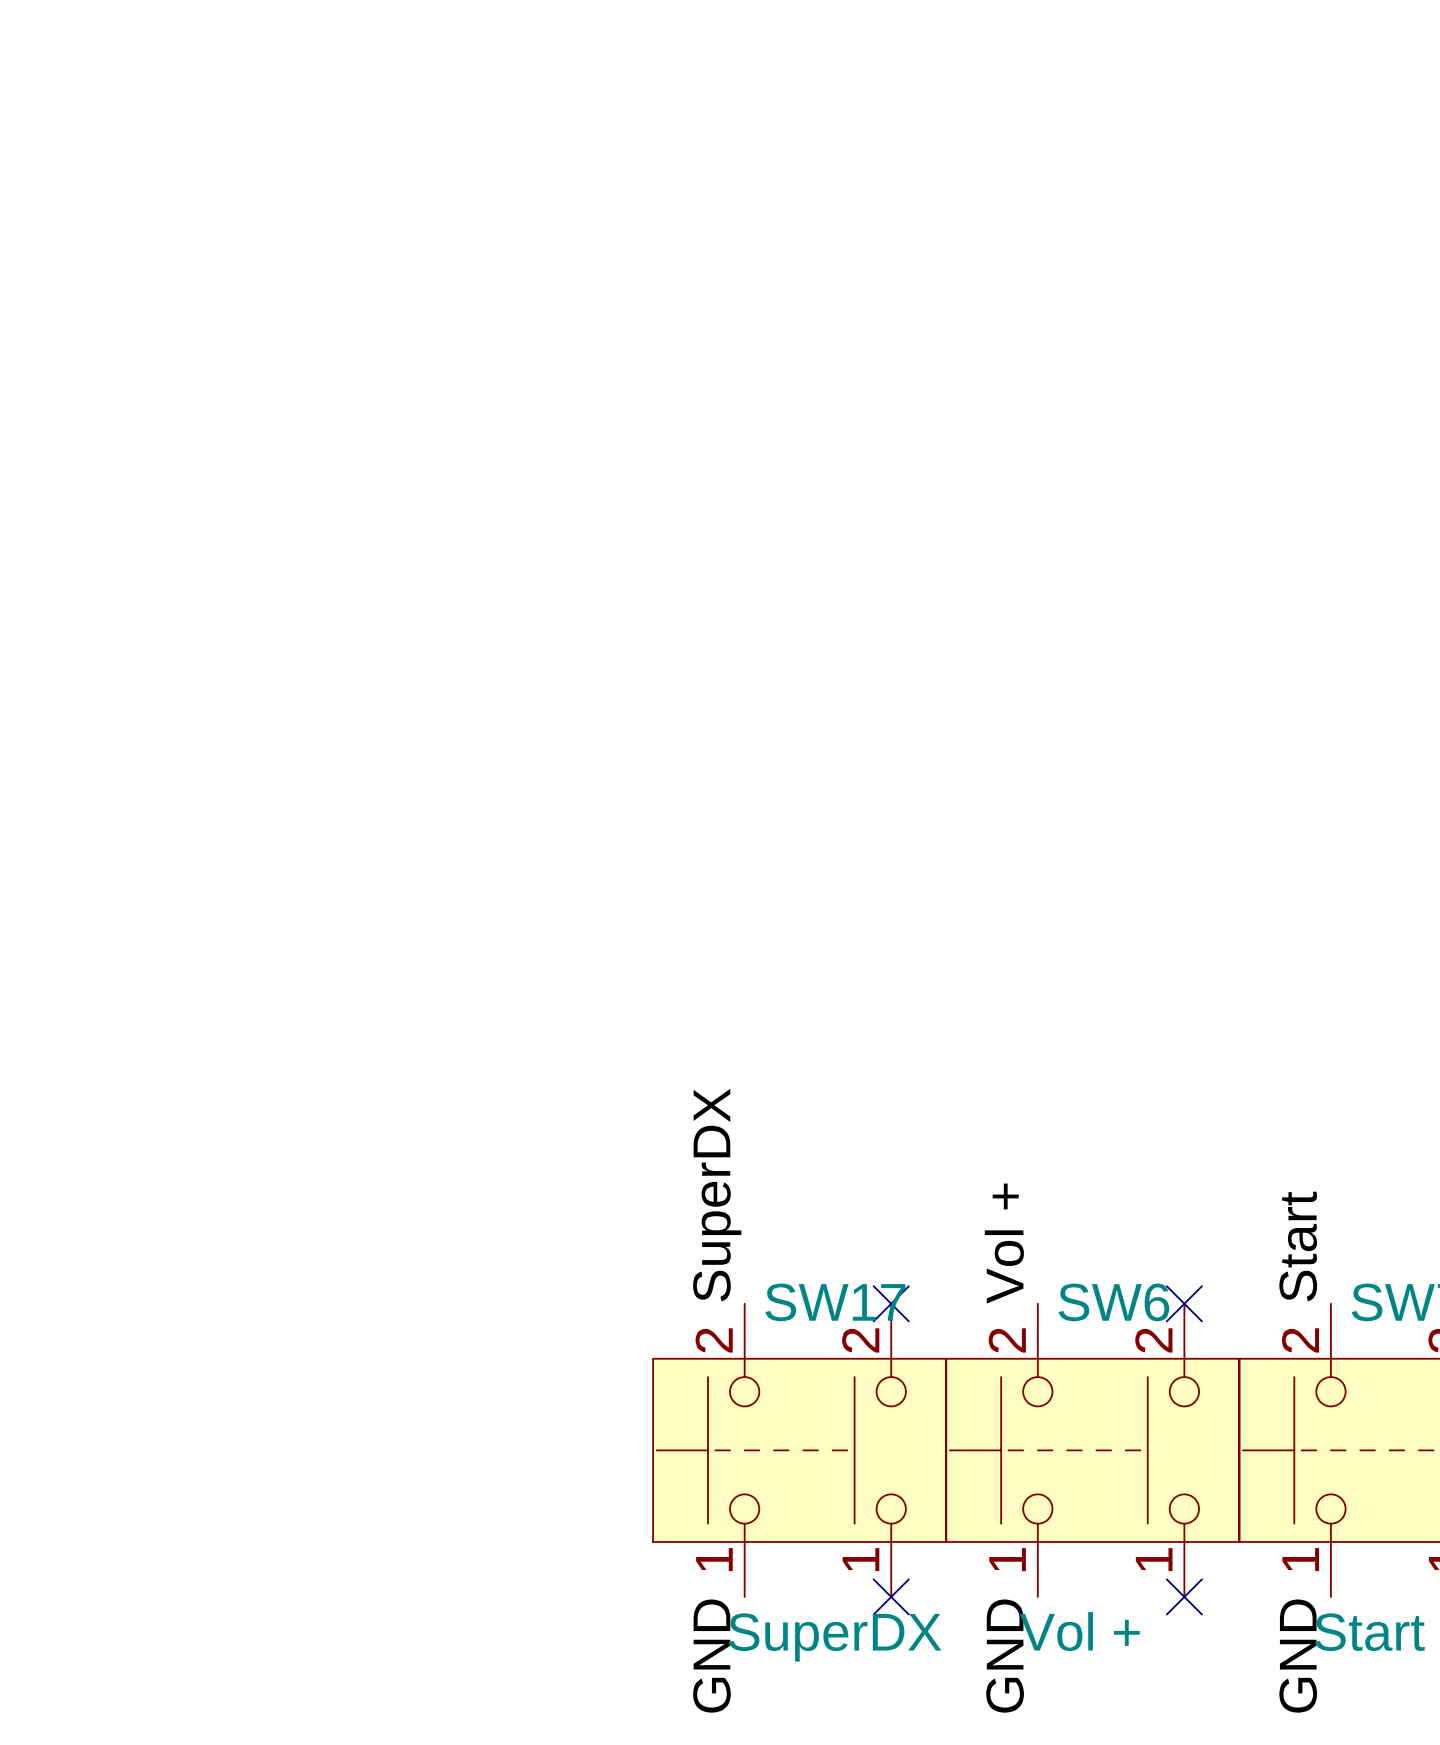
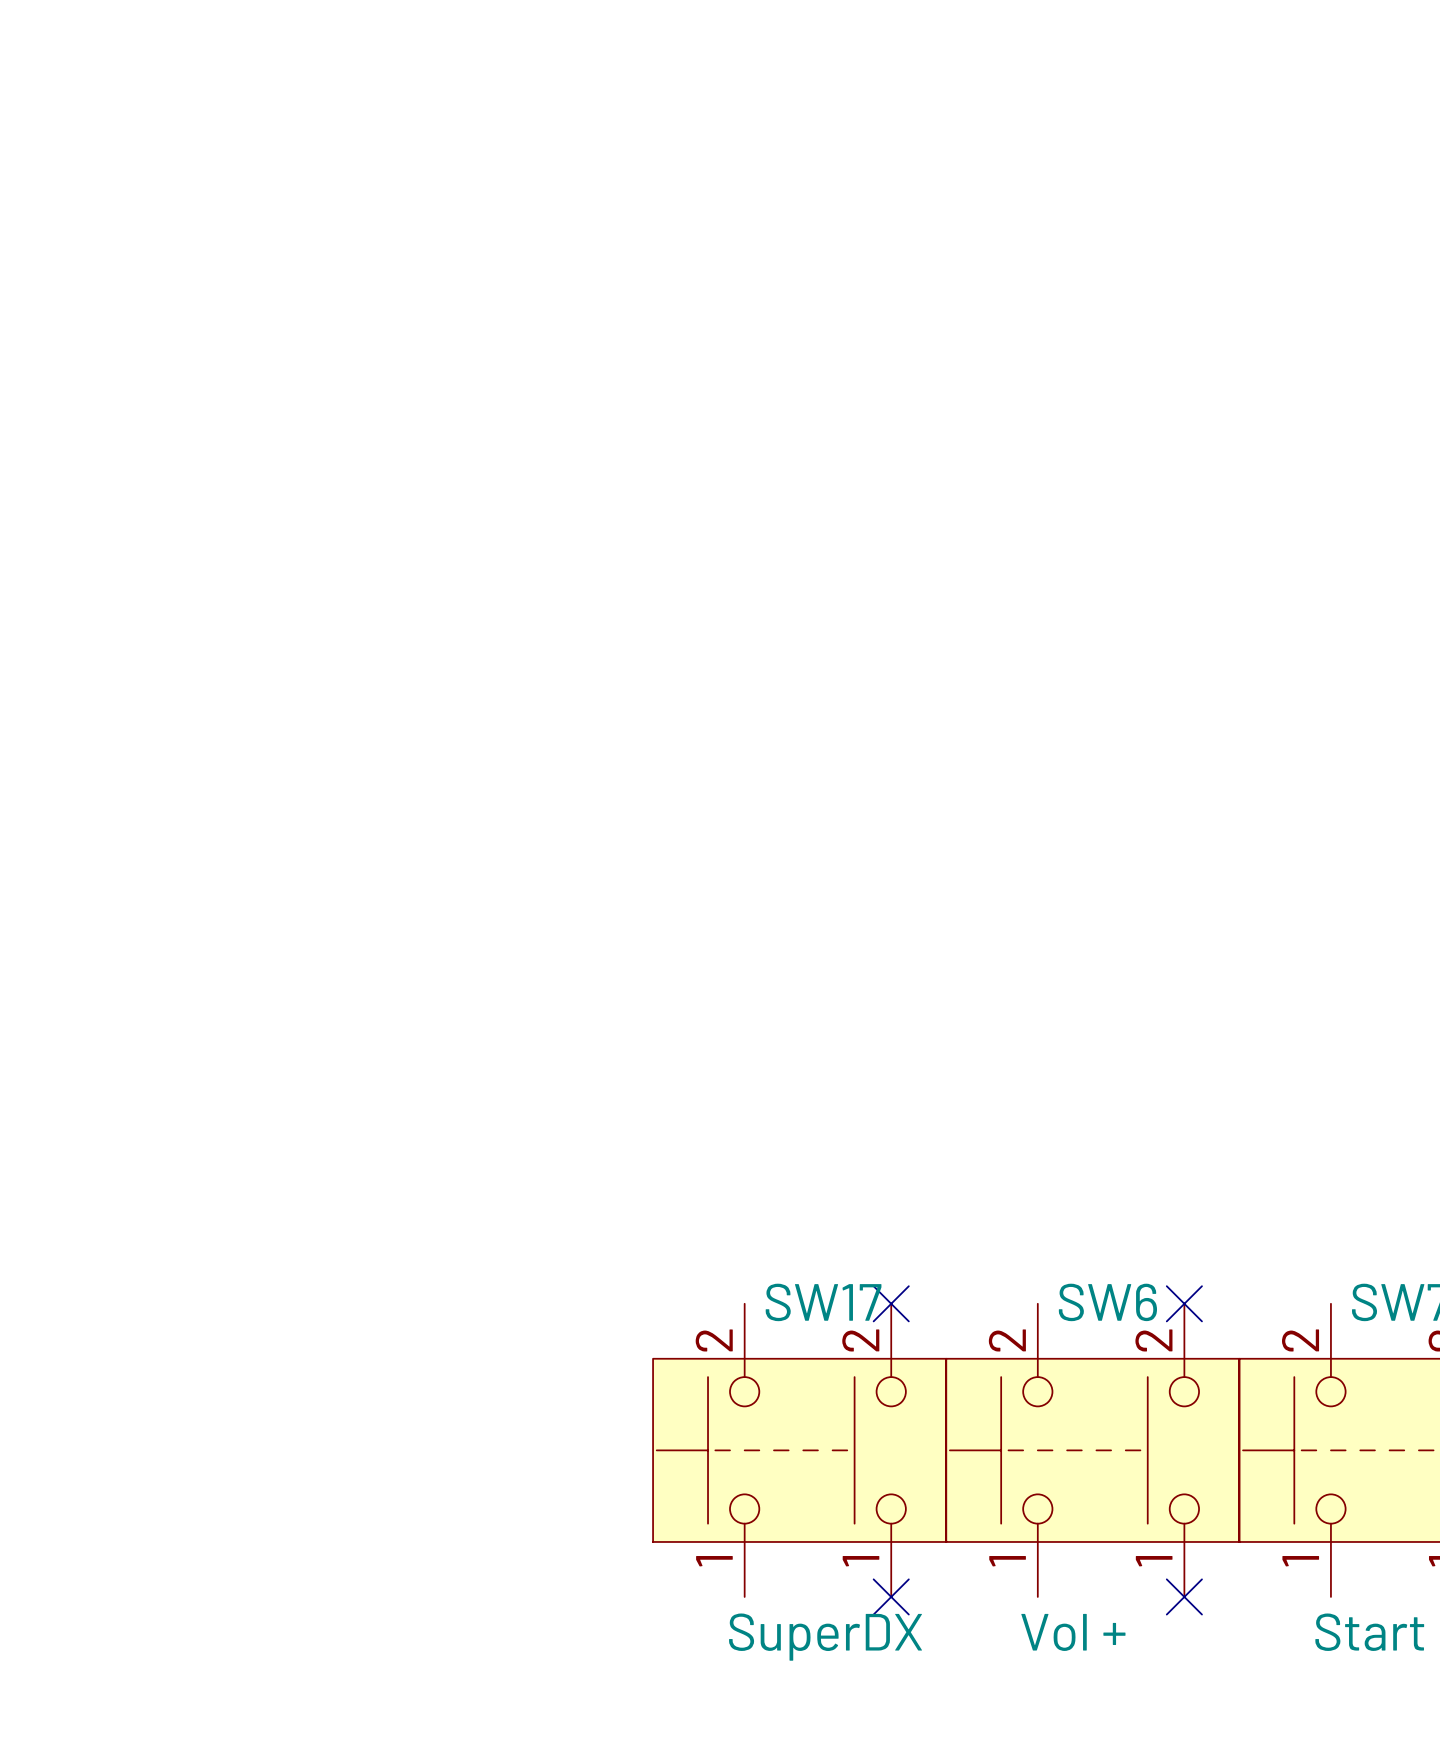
label: SuperDX (717, 1195) -> none
label: Vol + (1004, 1243) -> none
label: Start (1298, 1246) -> none
label: GND (711, 1656) -> none
label: GND (1005, 1656) -> none
label: GND (1298, 1656) -> none

